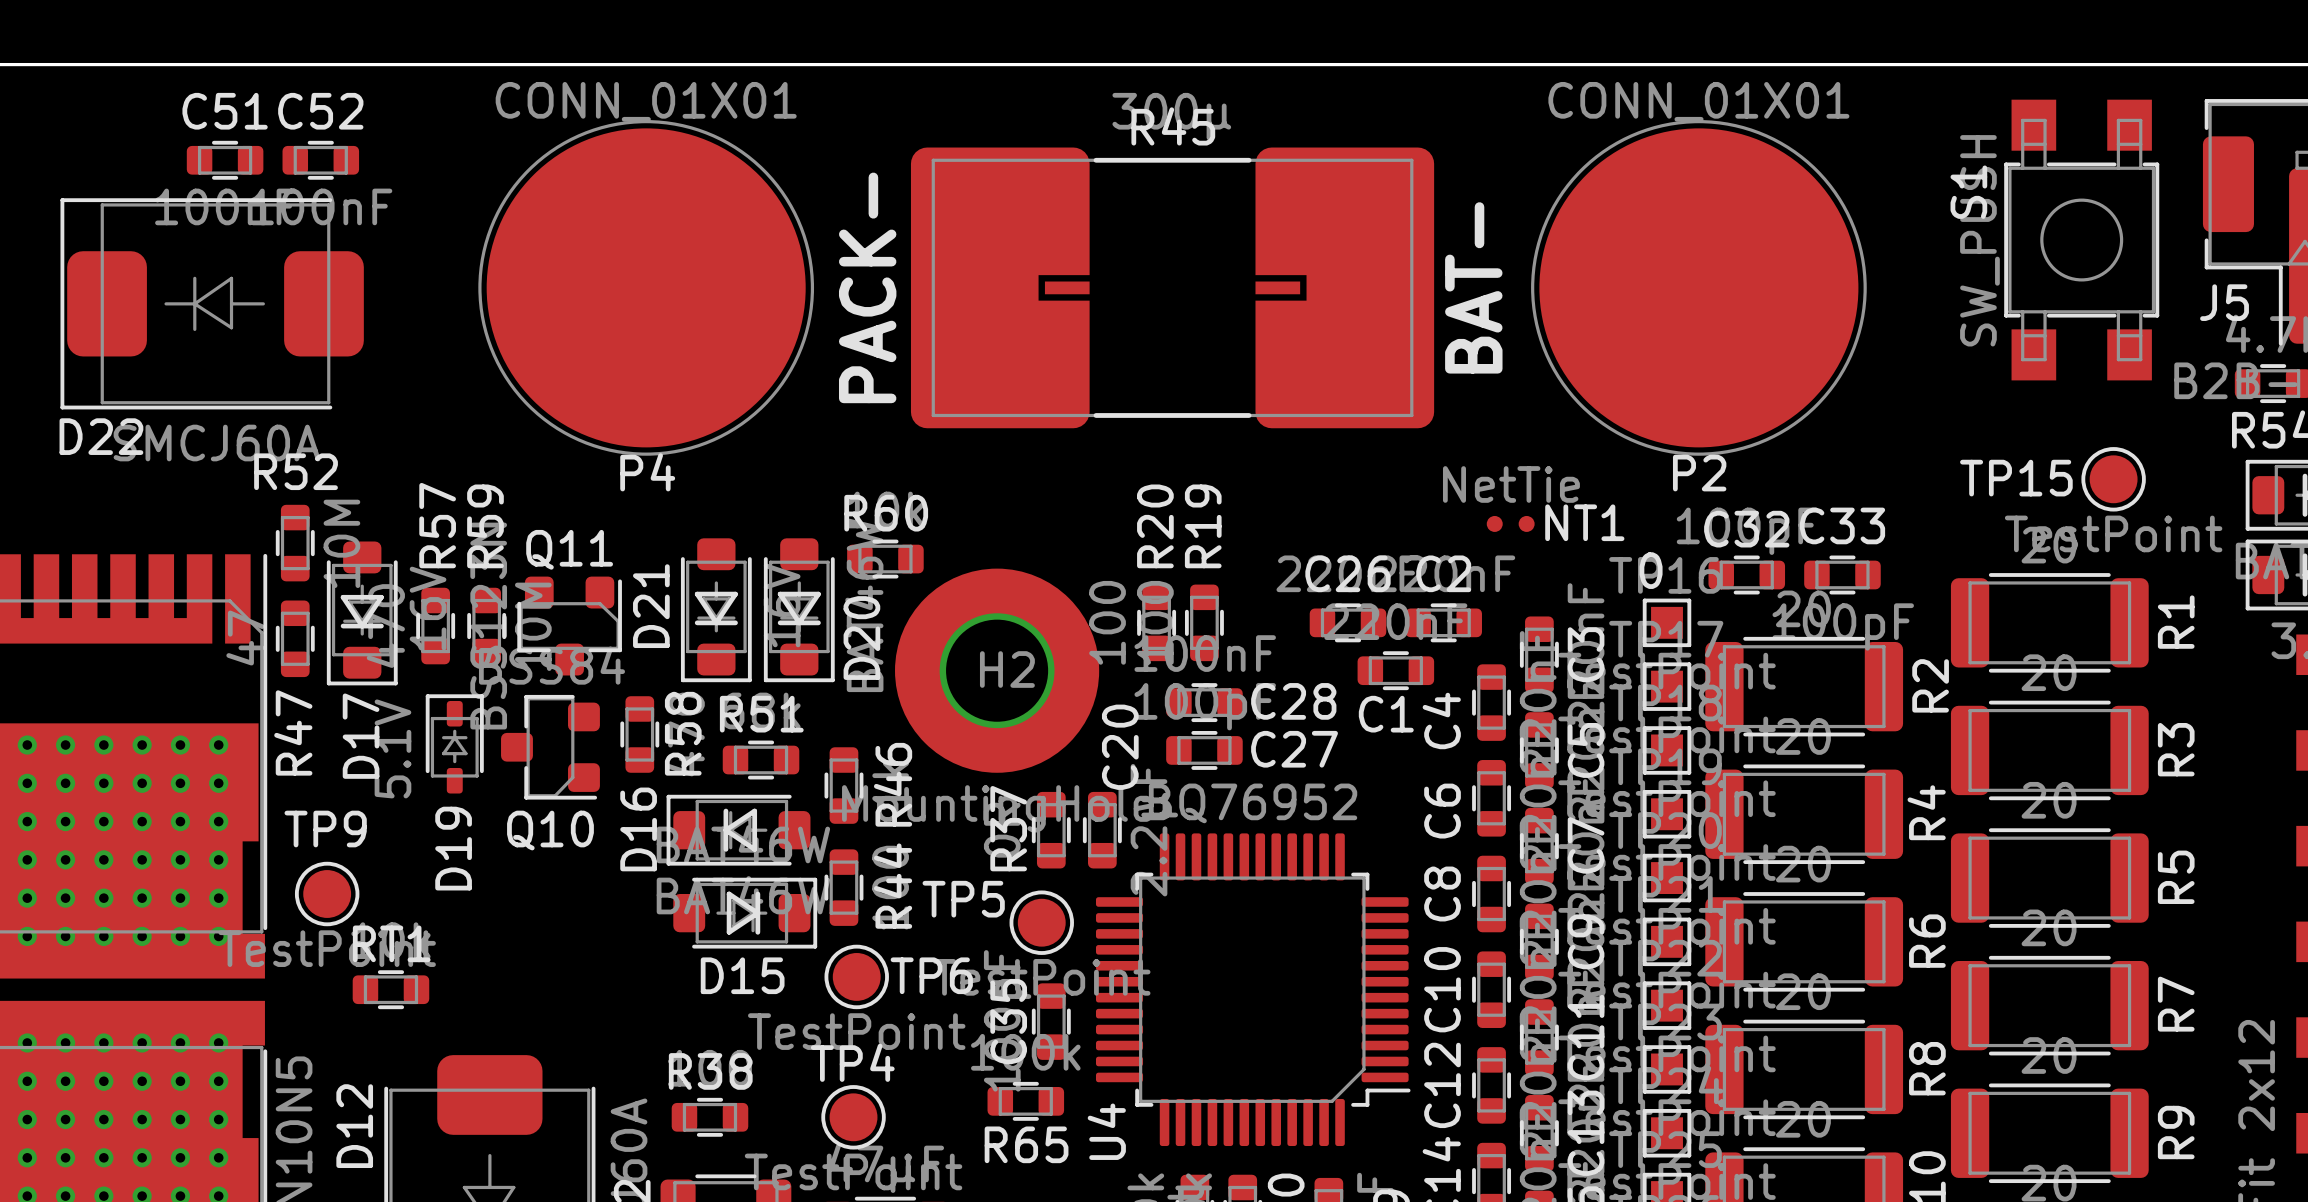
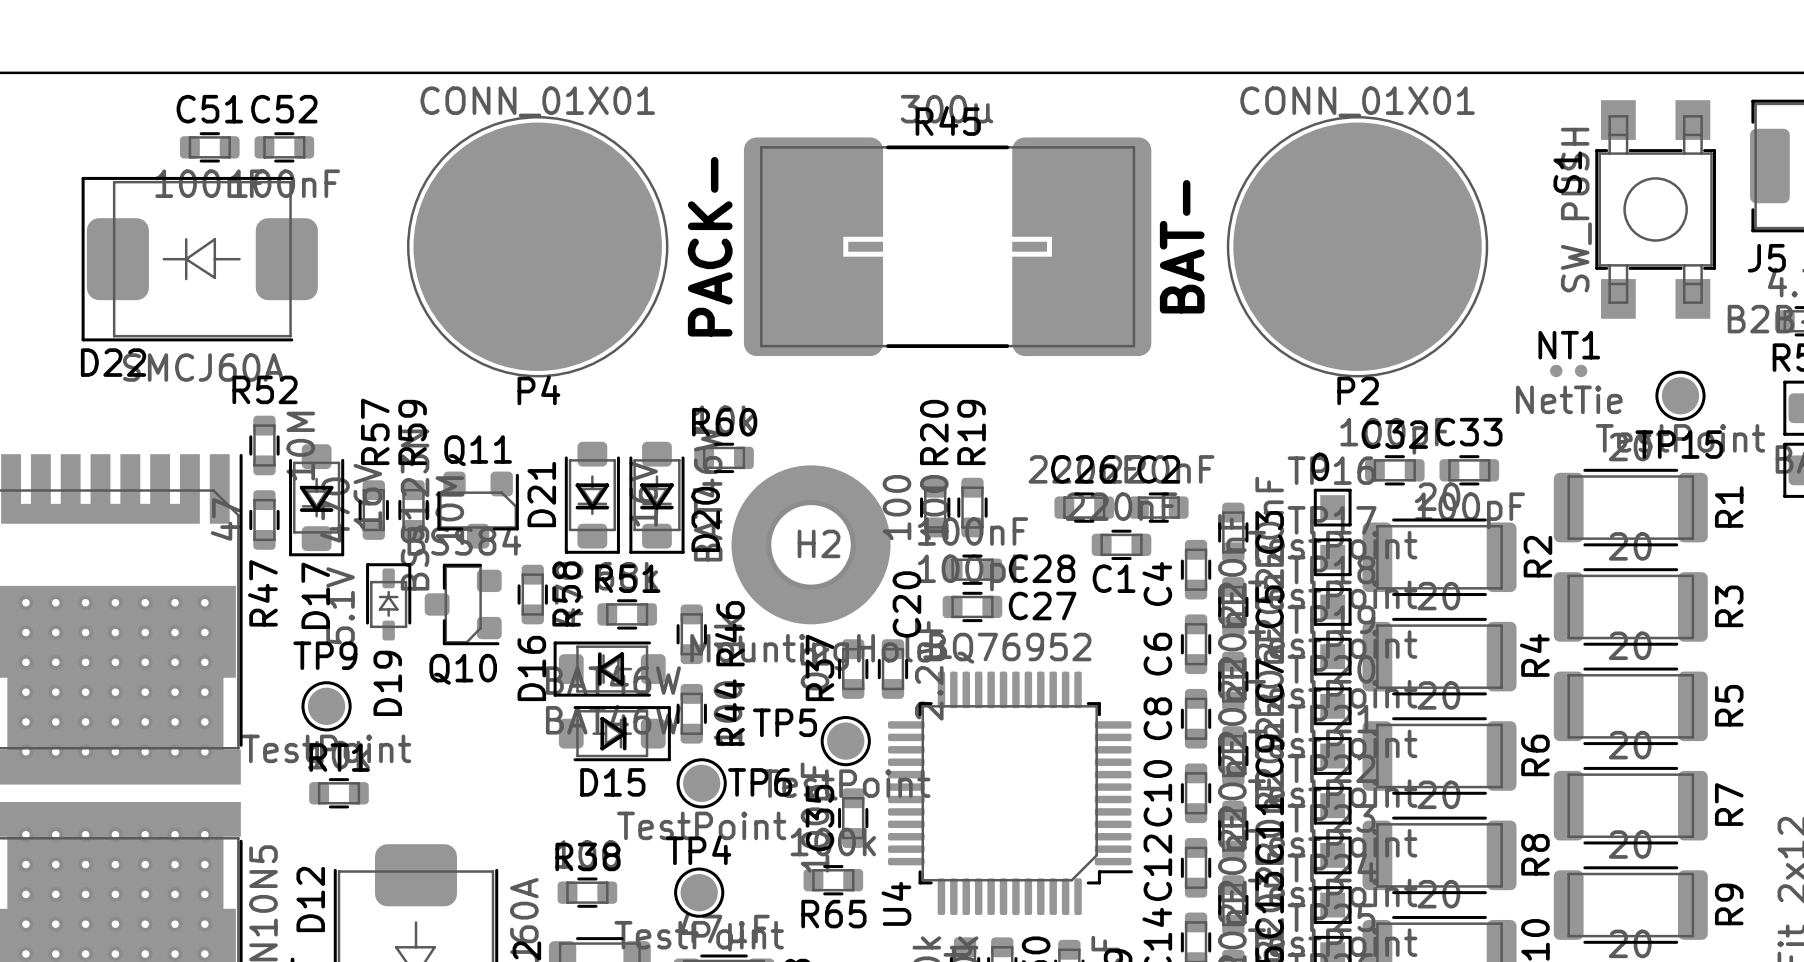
TP15 name position: TP15 (2016, 478) -> TP15 (1679, 444)
NT1 value position: NetTie (1511, 484) -> NetTie (1569, 399)
NT1 name position: NT1 (1584, 522) -> NT1 (1569, 345)
NT1 position: (1510, 523) -> (1568, 370)
TP9 position: (327, 894) -> (326, 706)

